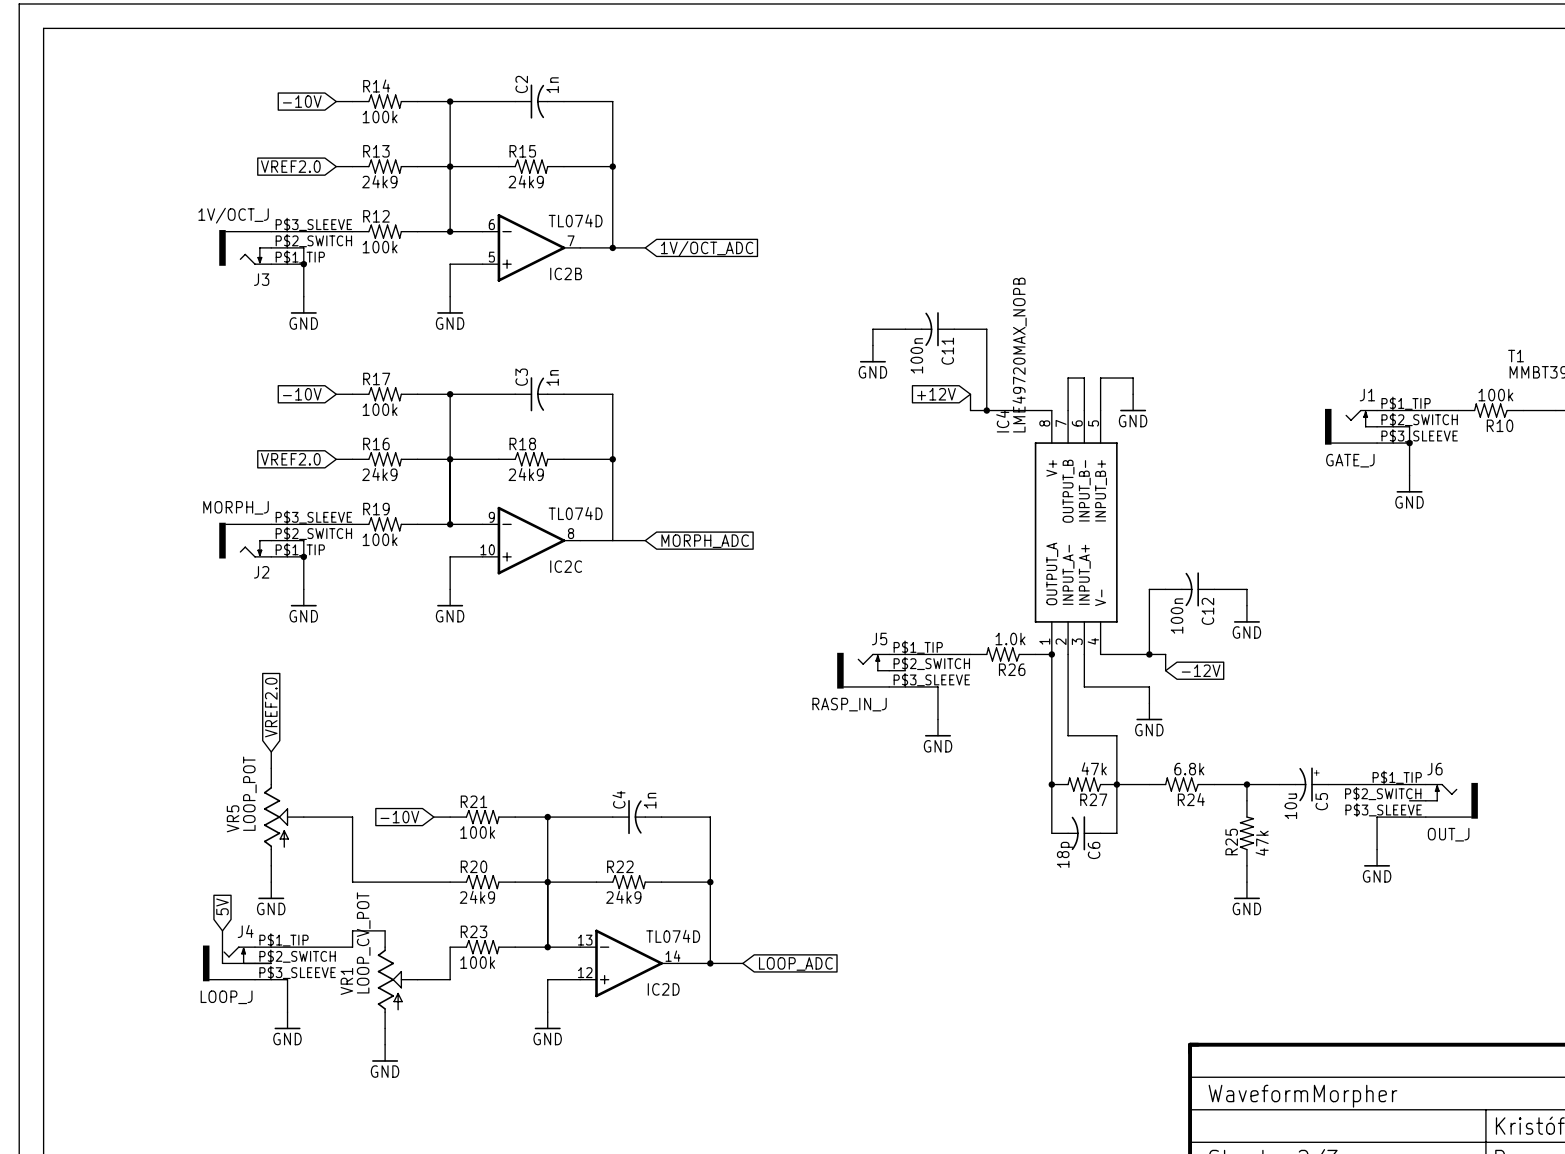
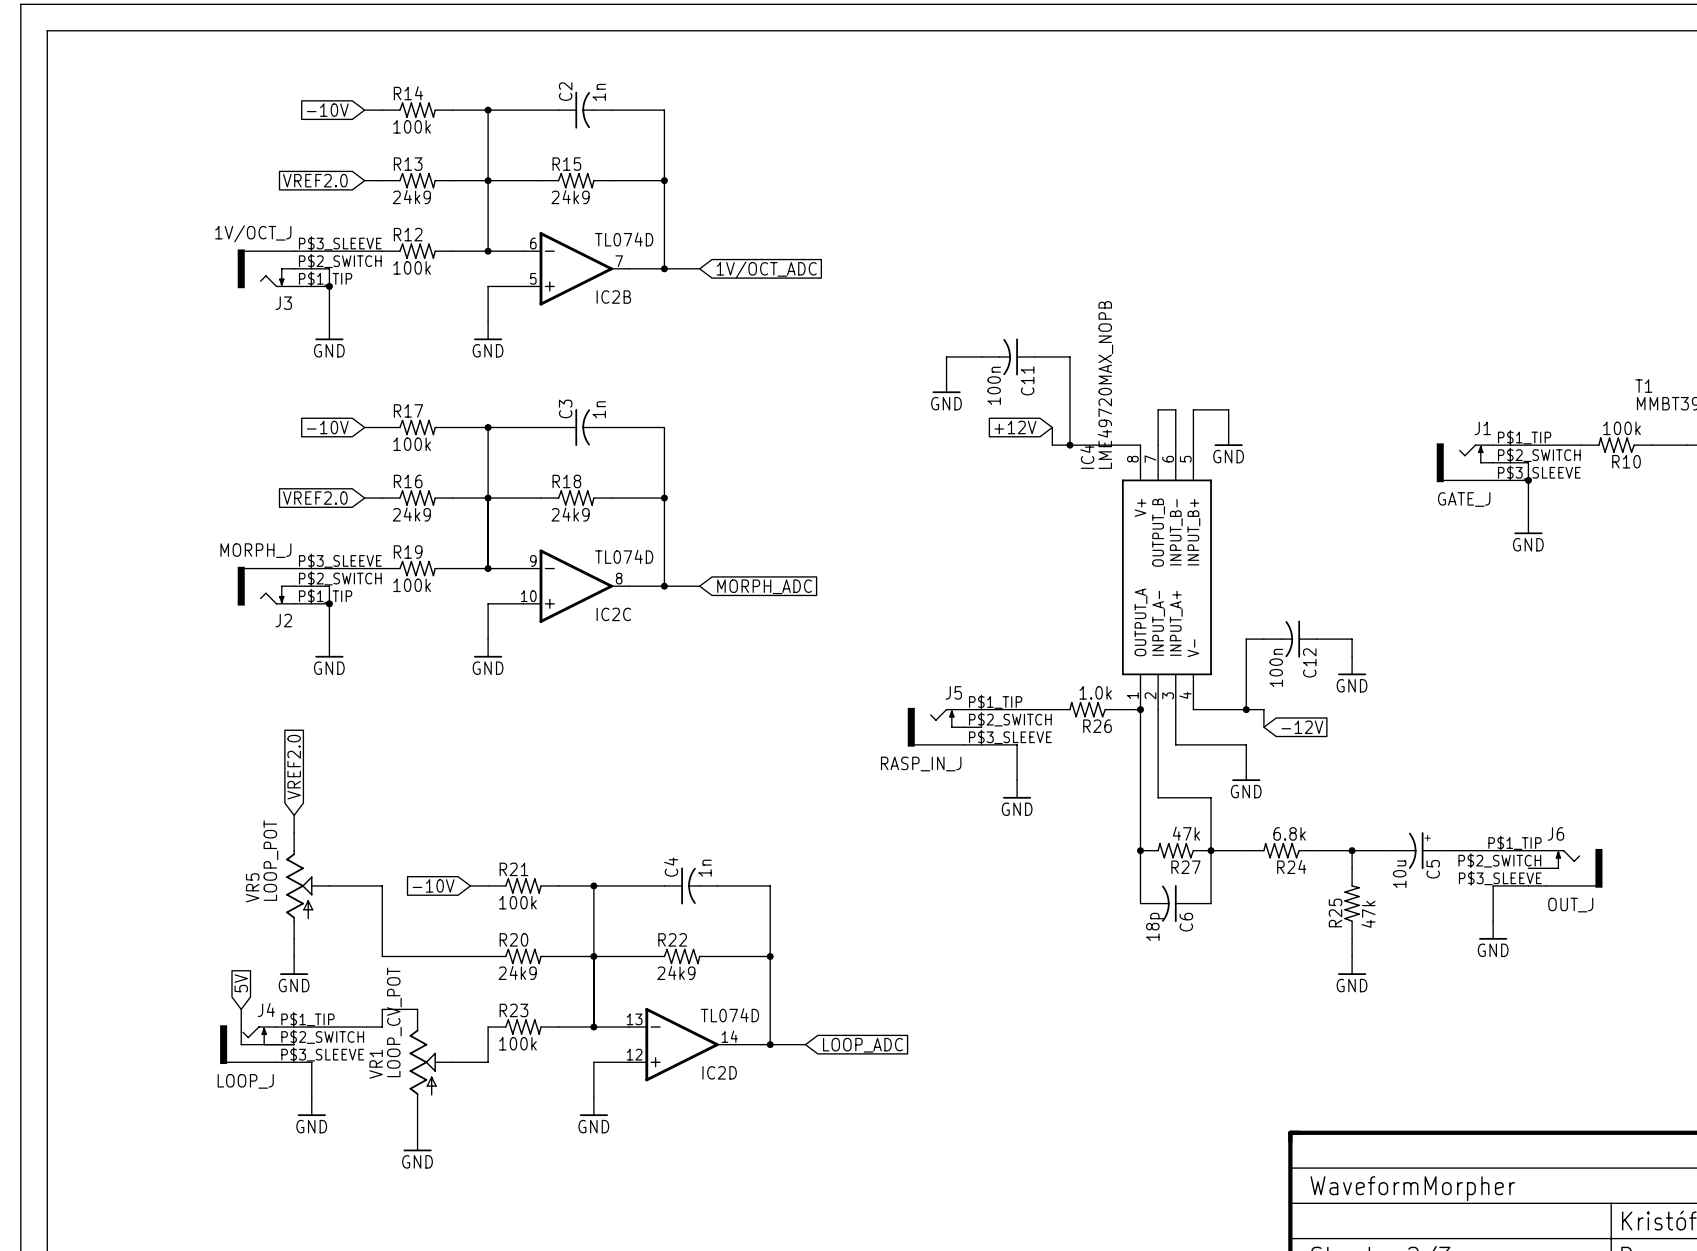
junction: none -> (664, 586)

